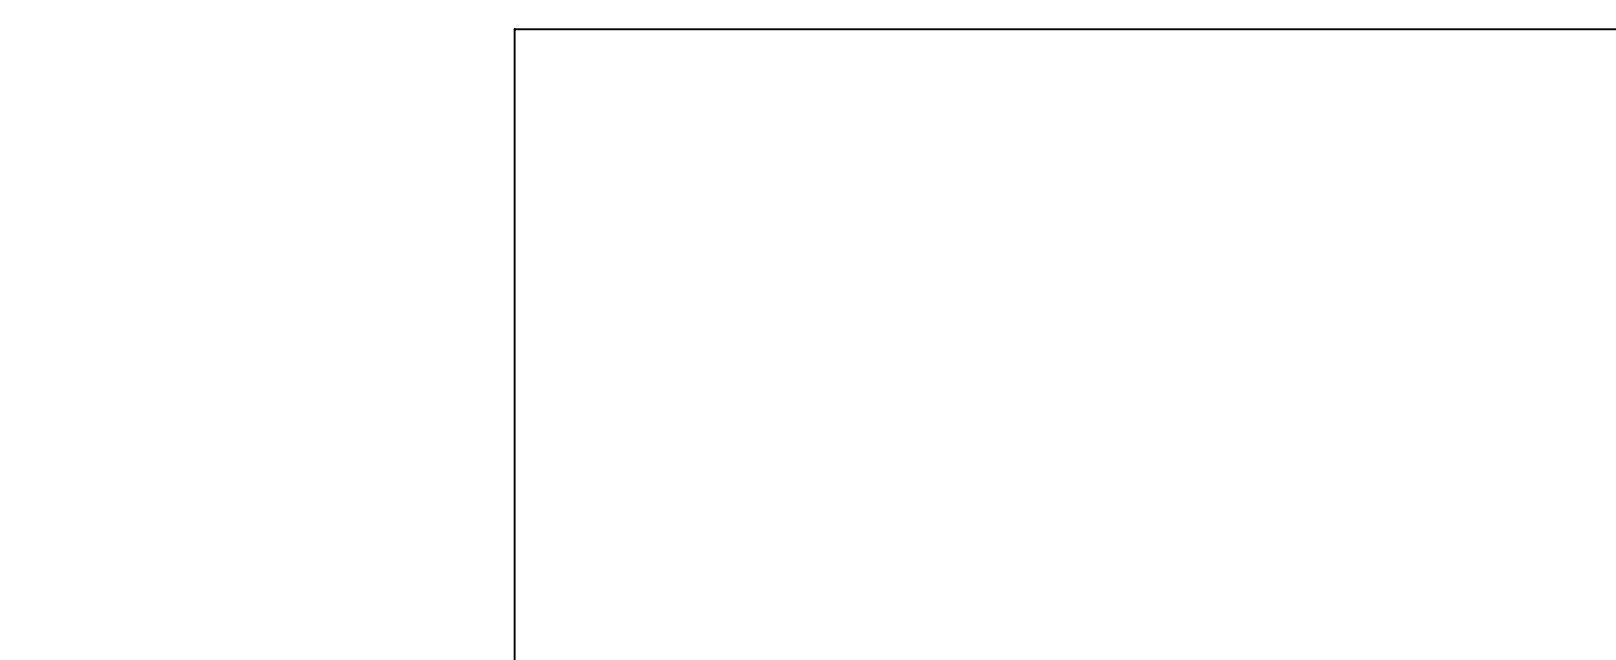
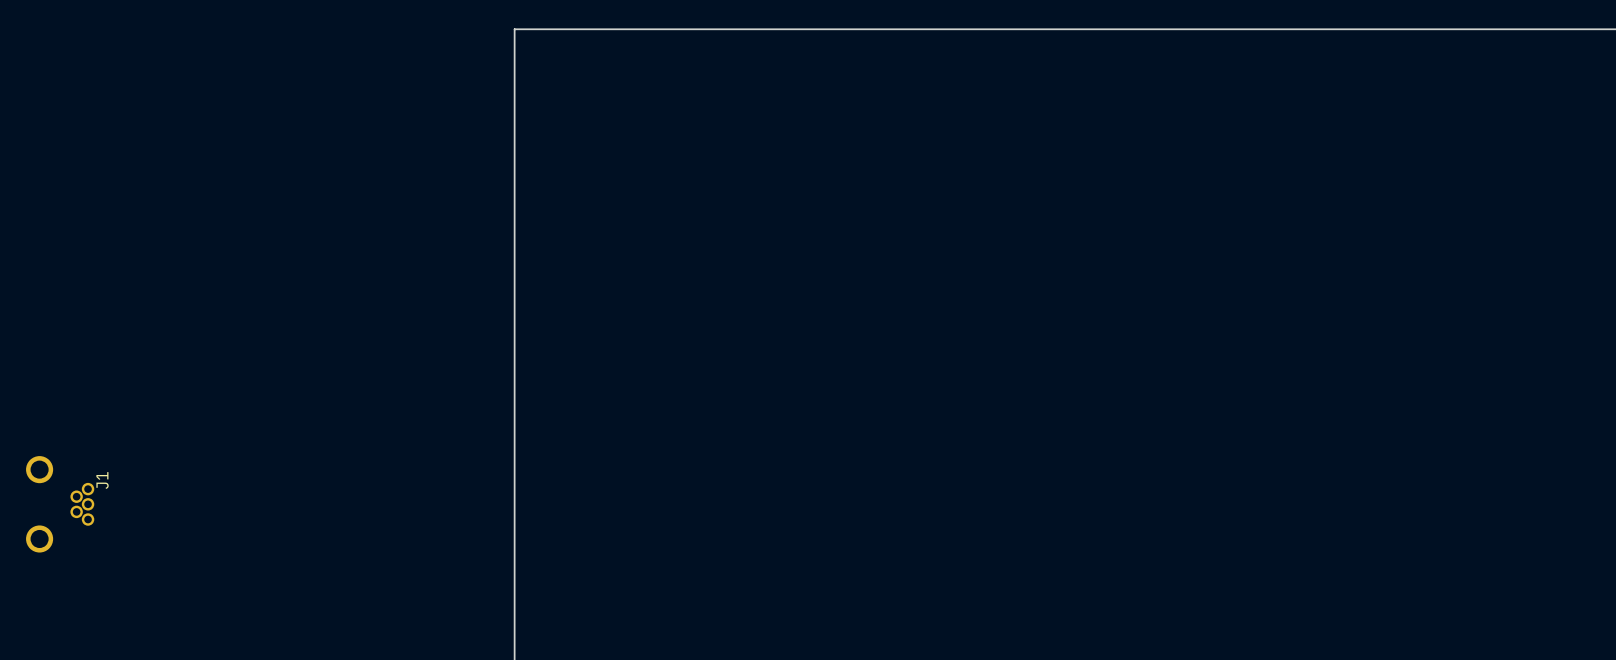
J1: none -> (60, 504)

